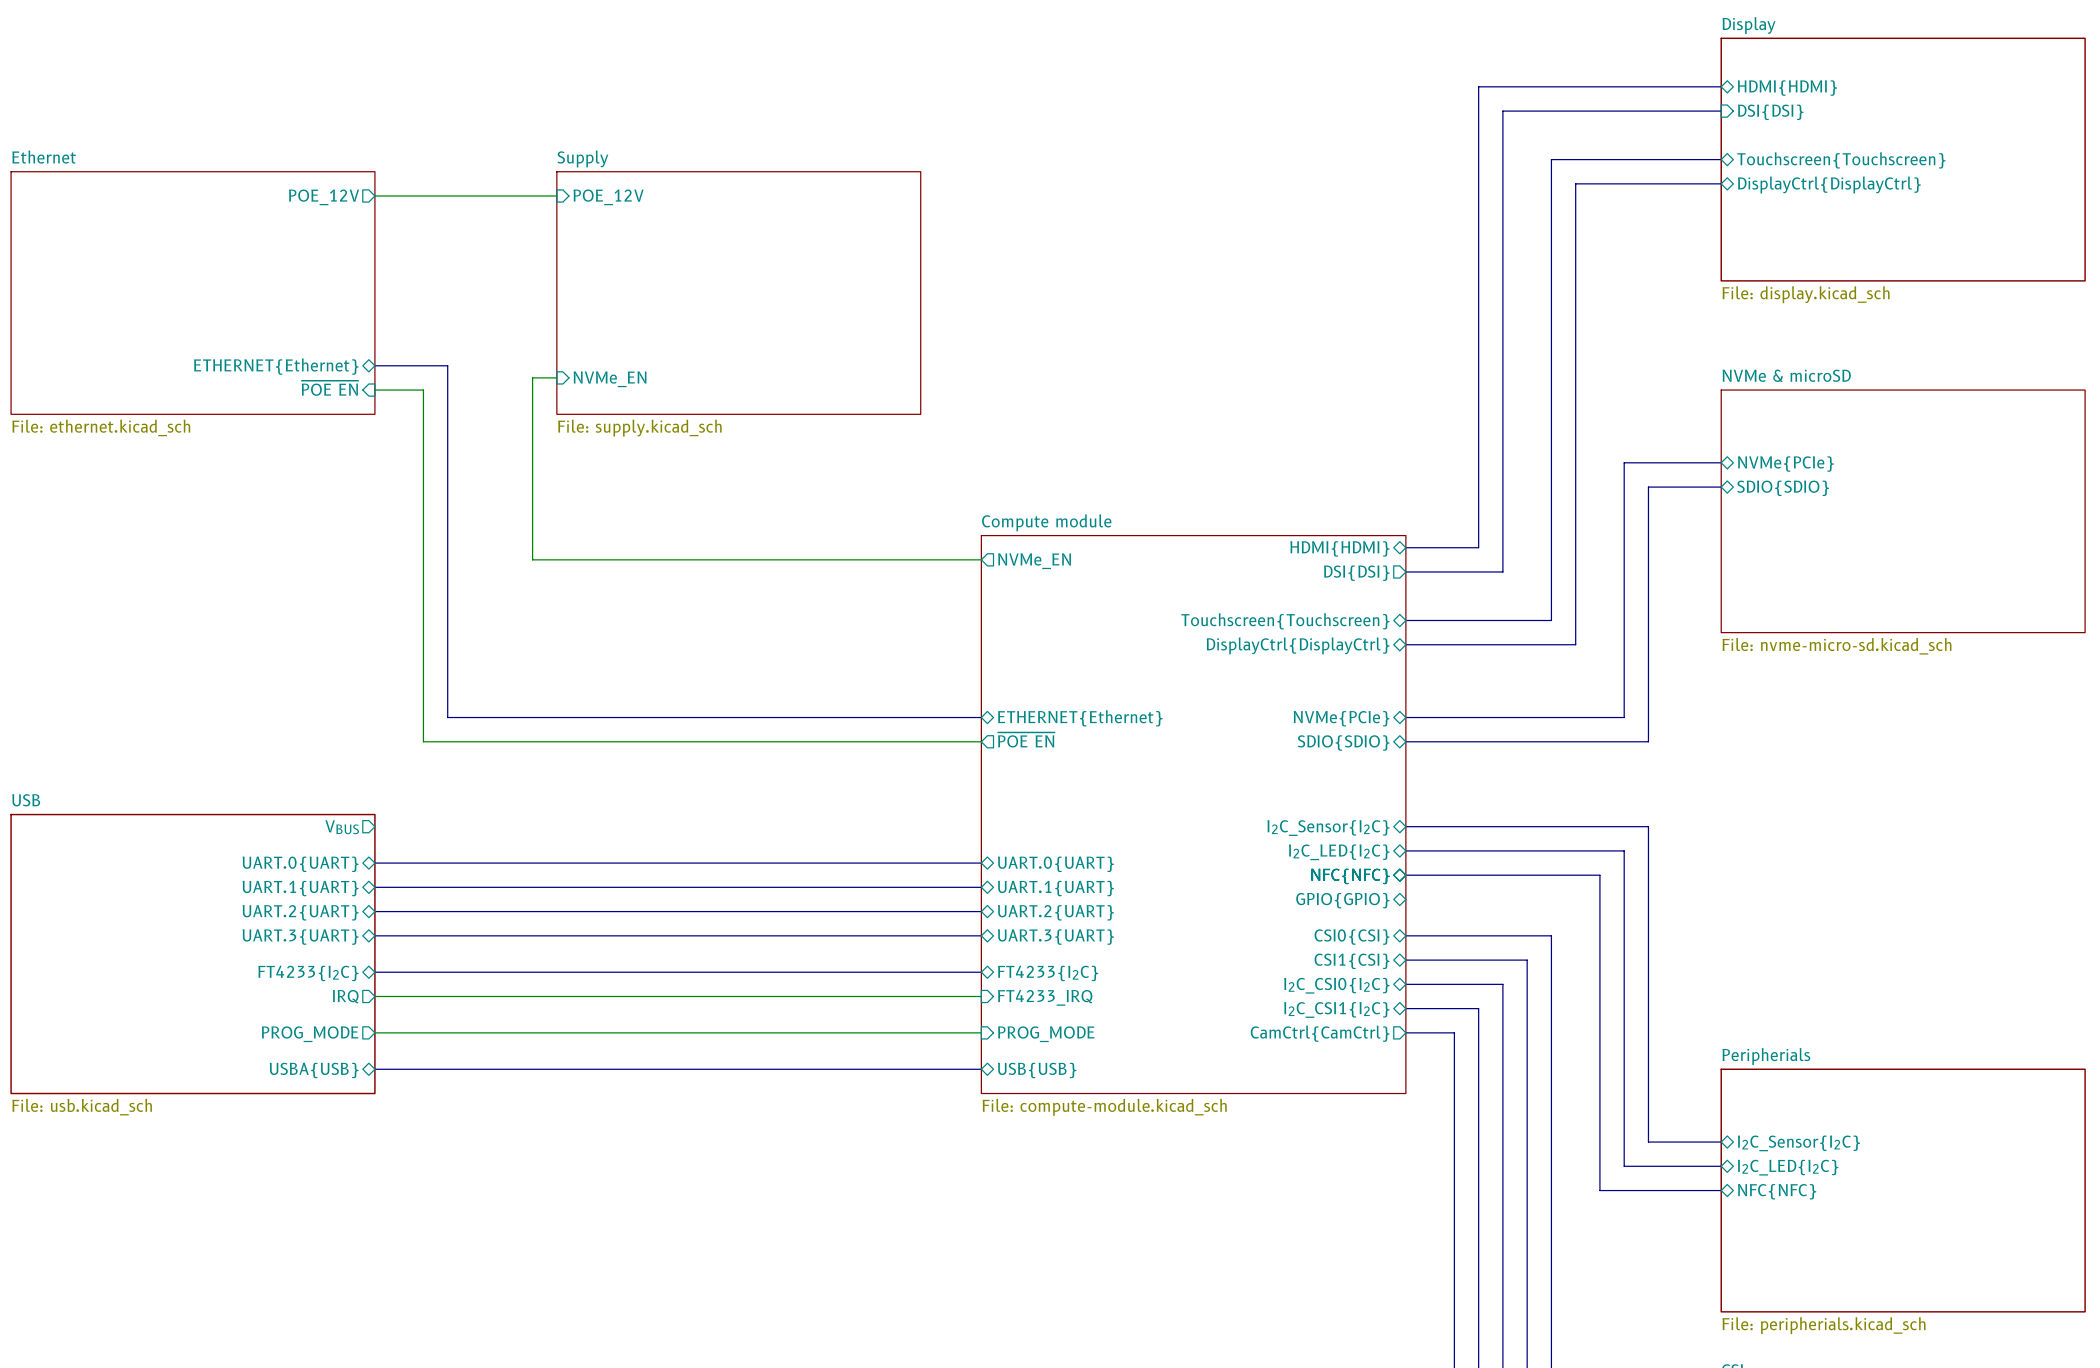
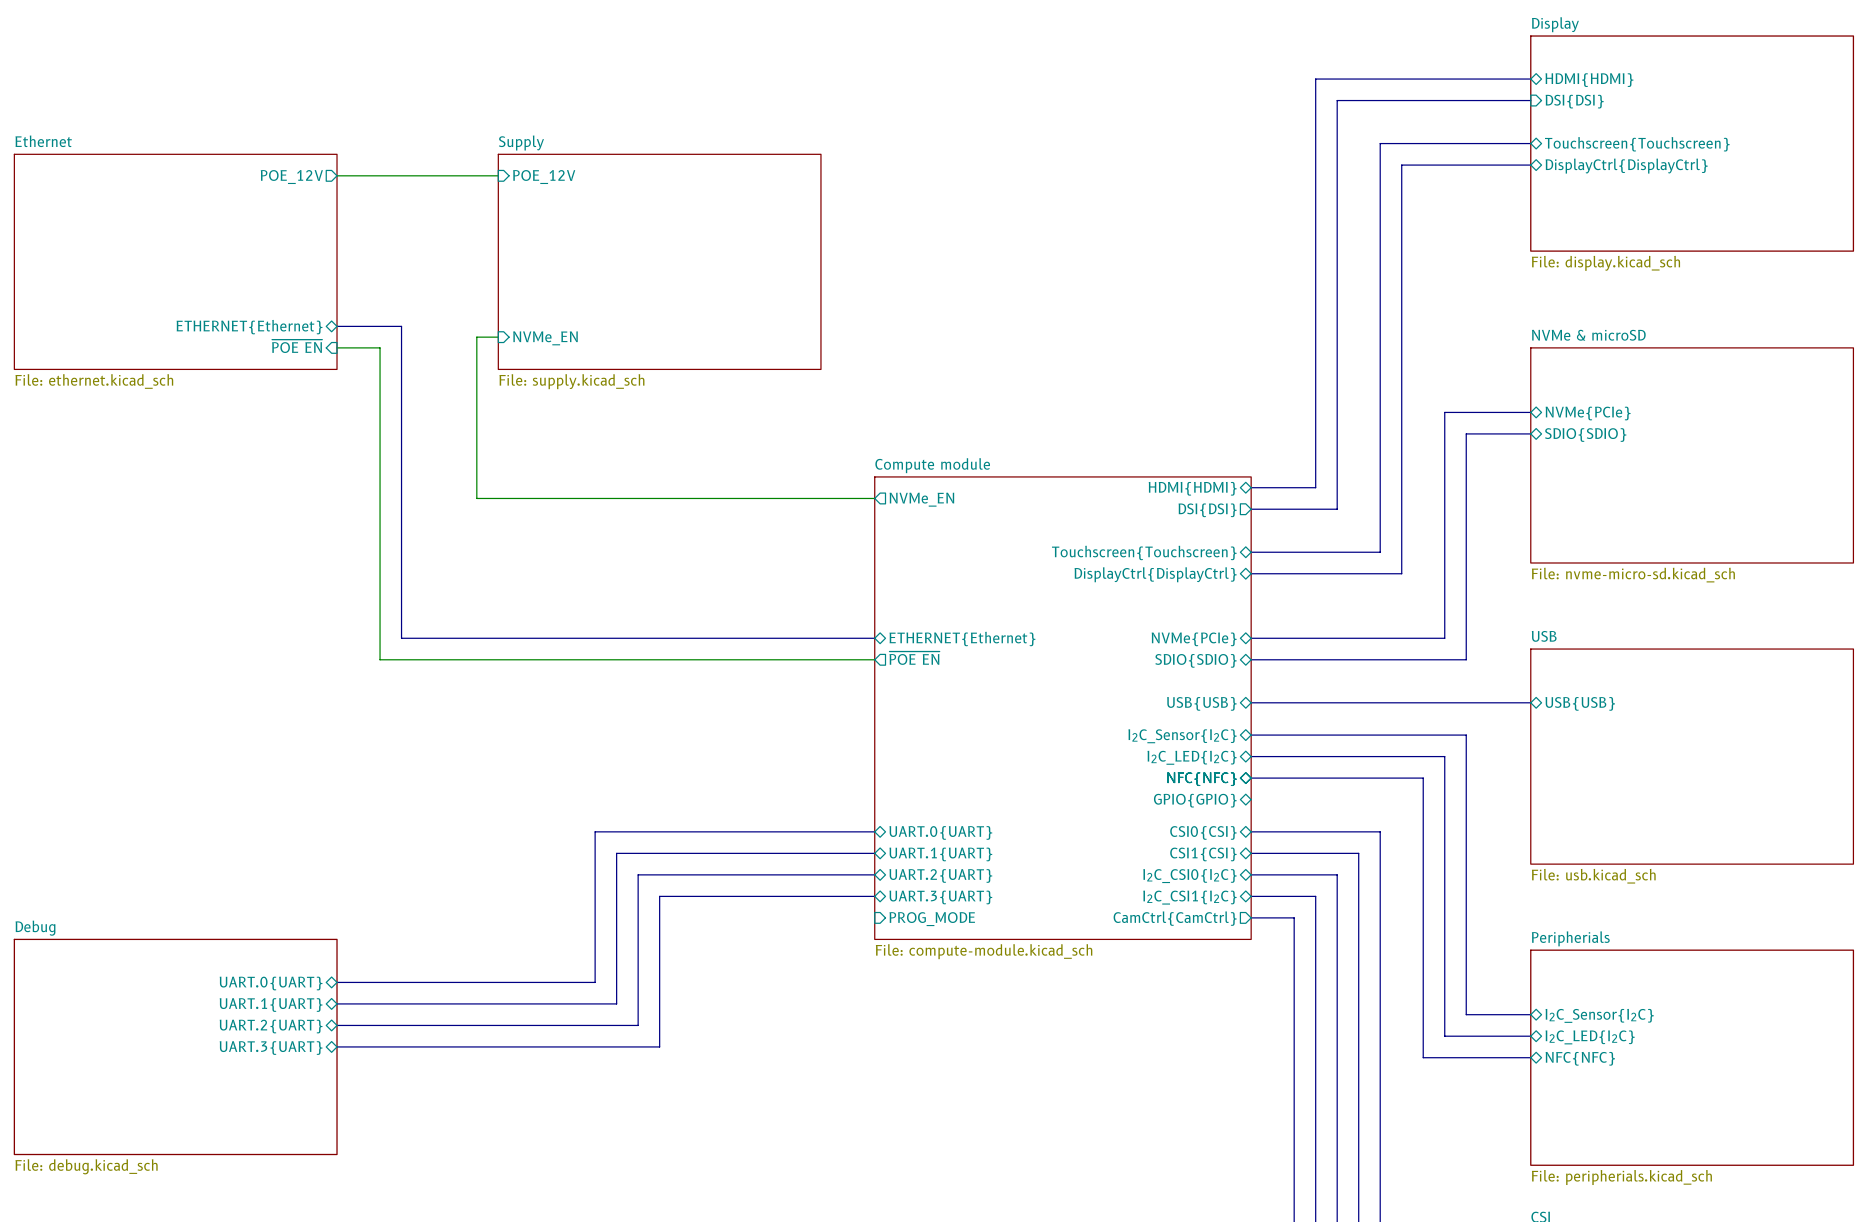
bus: none -> (1251, 702) (1530, 702)
sheet pin: none -> USB{USB} (1201, 703)
sheet pin: none -> USB{USB} (1580, 703)
sheet Compute module: none -> File: compute-module.kicad_sch (1062, 708)
sheet Compute module: File: compute-module.kicad_sch (1193, 814) -> none
sheet pin: VBUS (342, 827) -> none
sheet USB: none -> File: usb.kicad_sch (1692, 756)
bus: (374, 863) (981, 863) -> none
sheet pin: UART.0{UART} (300, 864) -> none
sheet pin: UART.0{UART} (1055, 864) -> none
bus: (374, 887) (981, 887) -> none
sheet pin: UART.1{UART} (300, 888) -> none
sheet pin position: UART.1{UART} (1055, 888) -> UART.1{UART} (940, 854)
bus: (374, 911) (981, 911) -> none
sheet pin: UART.2{UART} (300, 912) -> none
sheet pin position: UART.2{UART} (1055, 912) -> UART.2{UART} (940, 875)
bus: (374, 935) (666, 935) -> (337, 982) (595, 982) (595, 831)
sheet pin: UART.3{UART} (300, 937) -> none
sheet pin: UART.3{UART} (1055, 937) -> UART.0{UART} (940, 832)
sheet USB: File: usb.kicad_sch (193, 954) -> none
bus: none -> (874, 853) (616, 853) (616, 1003) (337, 1003)
bus: (374, 972) (981, 972) -> none
sheet pin: FT4233{I2C} (308, 973) -> none
sheet pin: FT4233{I2C} (1048, 973) -> none
bus: none -> (874, 874) (638, 874) (638, 1025) (337, 1025)
sheet pin: IRQ (345, 996) -> none
wire: (374, 996) (981, 996) -> none
sheet pin: FT4233_IRQ (1045, 997) -> none
bus: none -> (874, 896) (659, 896) (659, 1046) (337, 1046)
sheet pin: none -> UART.3{UART} (940, 897)
wire: (374, 1032) (981, 1032) -> none
sheet pin: PROG_MODE (310, 1034) -> none
bus: (374, 1069) (981, 1069) -> none
sheet pin: USBA{USB} (314, 1070) -> none
sheet pin: USB{USB} (1037, 1070) -> none
sheet pin: none -> UART.0{UART} (271, 983)
sheet pin: none -> UART.1{UART} (271, 1005)
sheet pin: none -> UART.2{UART} (271, 1026)
sheet Debug: none -> File: debug.kicad_sch (175, 1046)
sheet pin: none -> UART.3{UART} (271, 1048)

